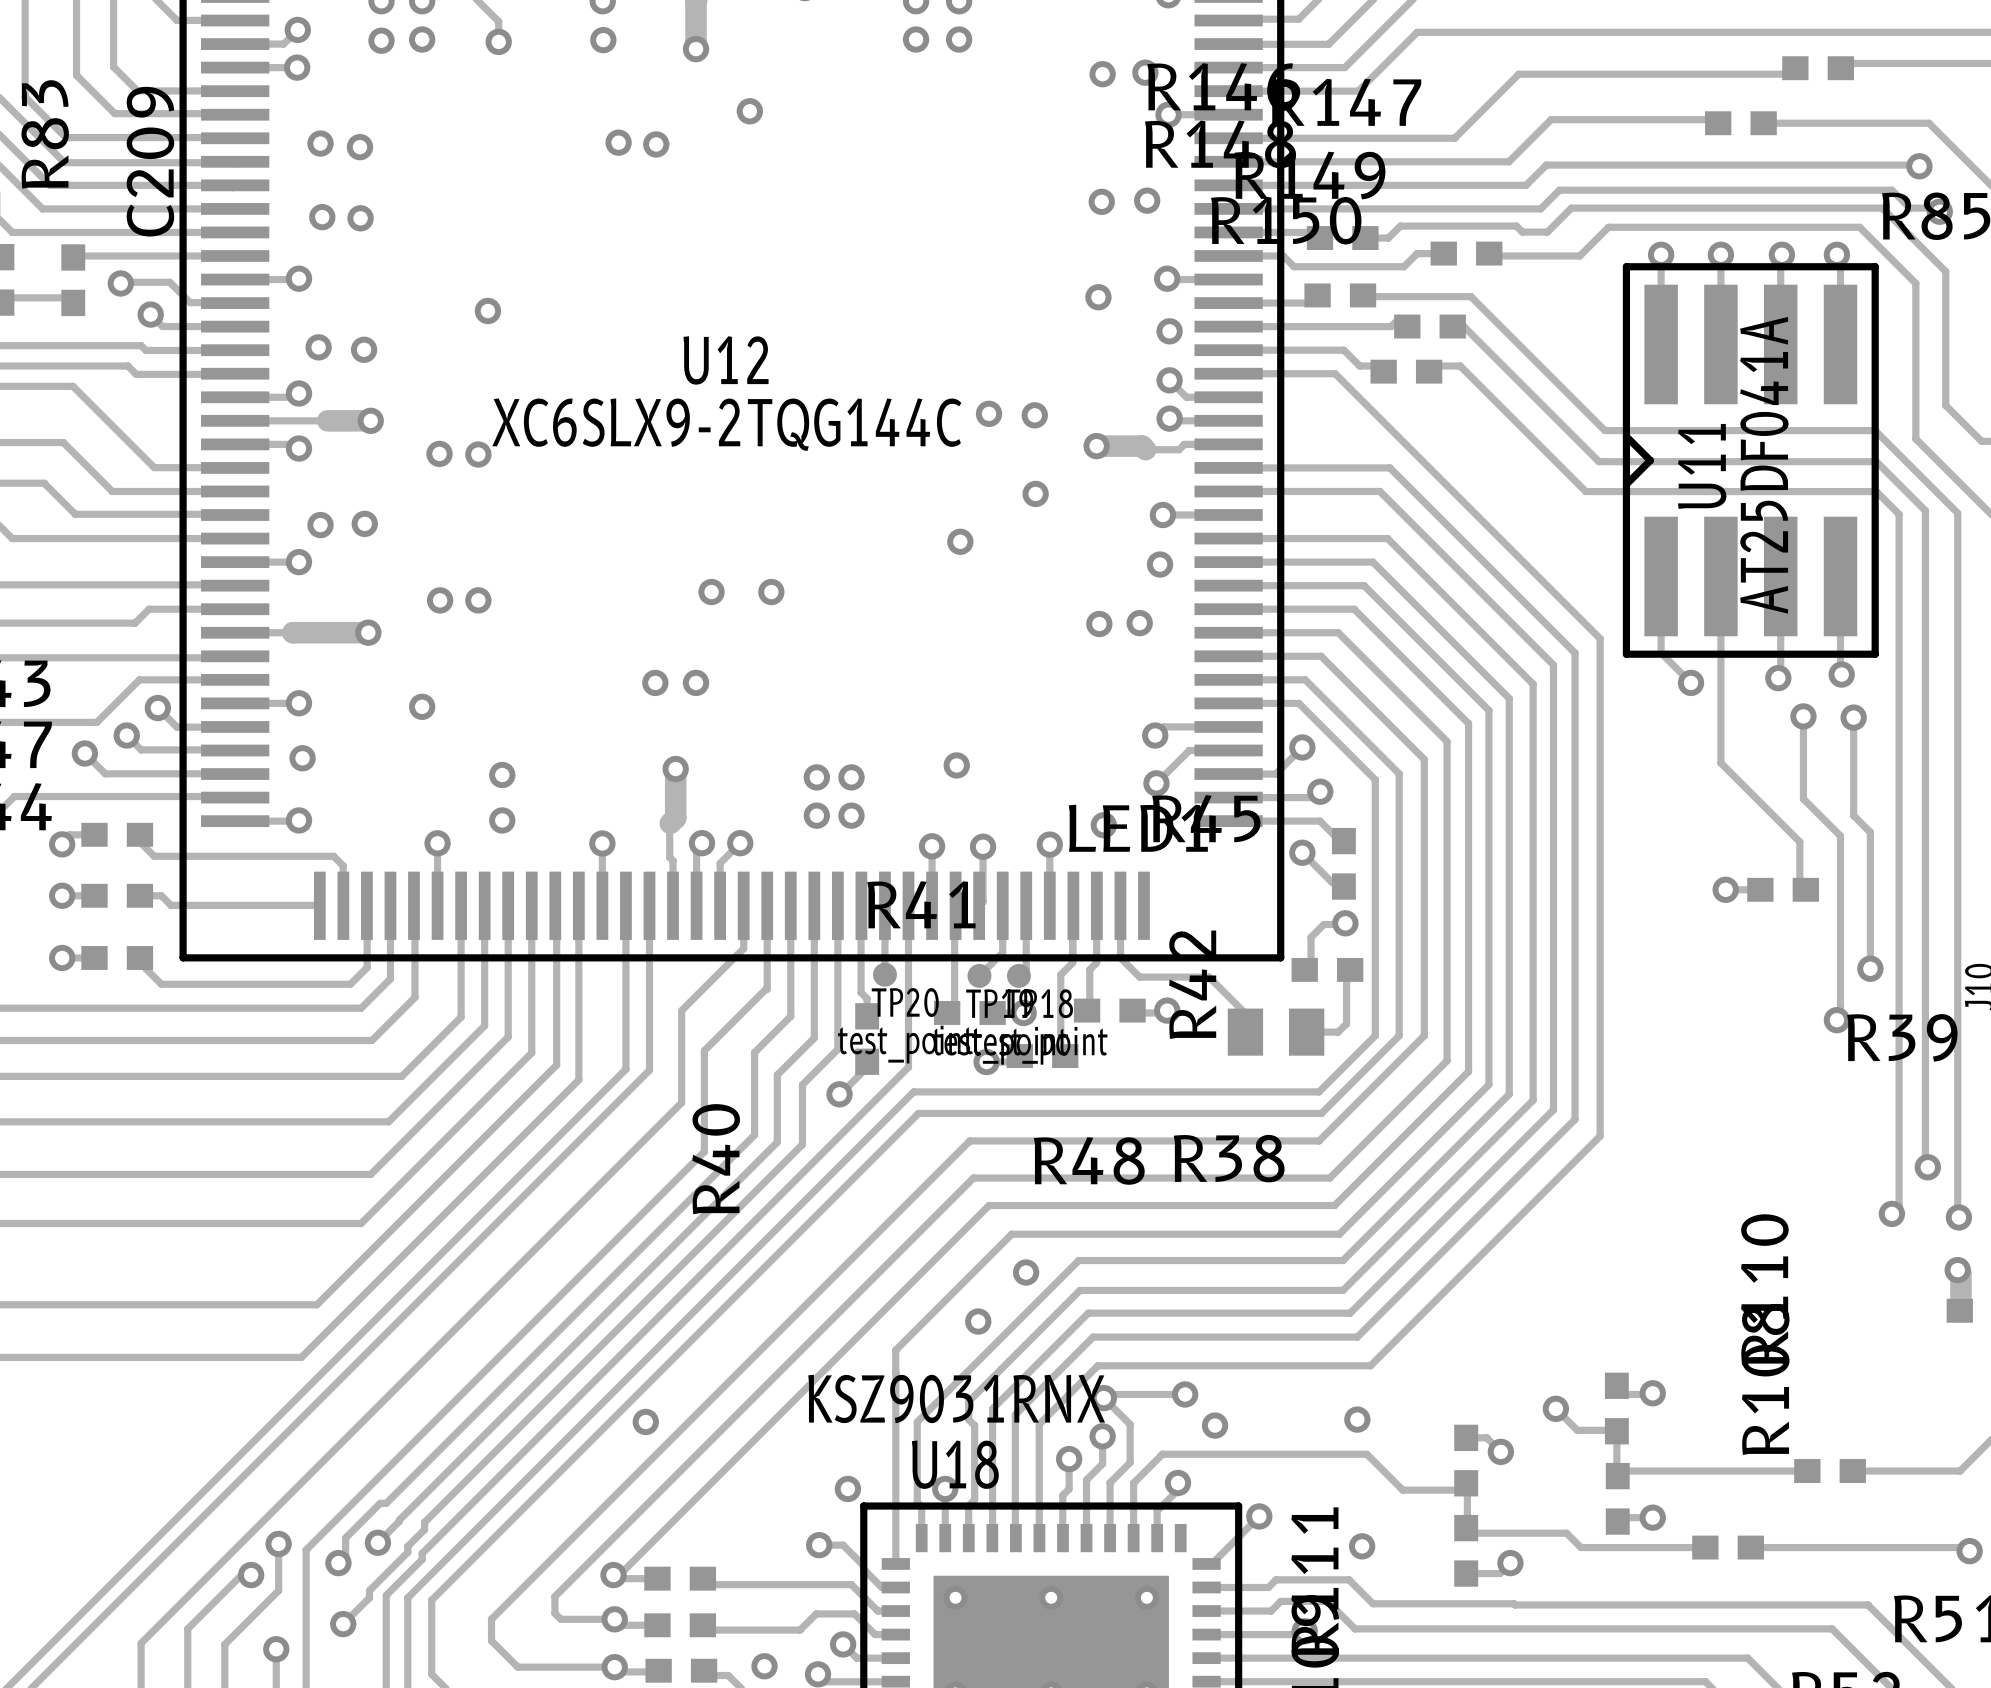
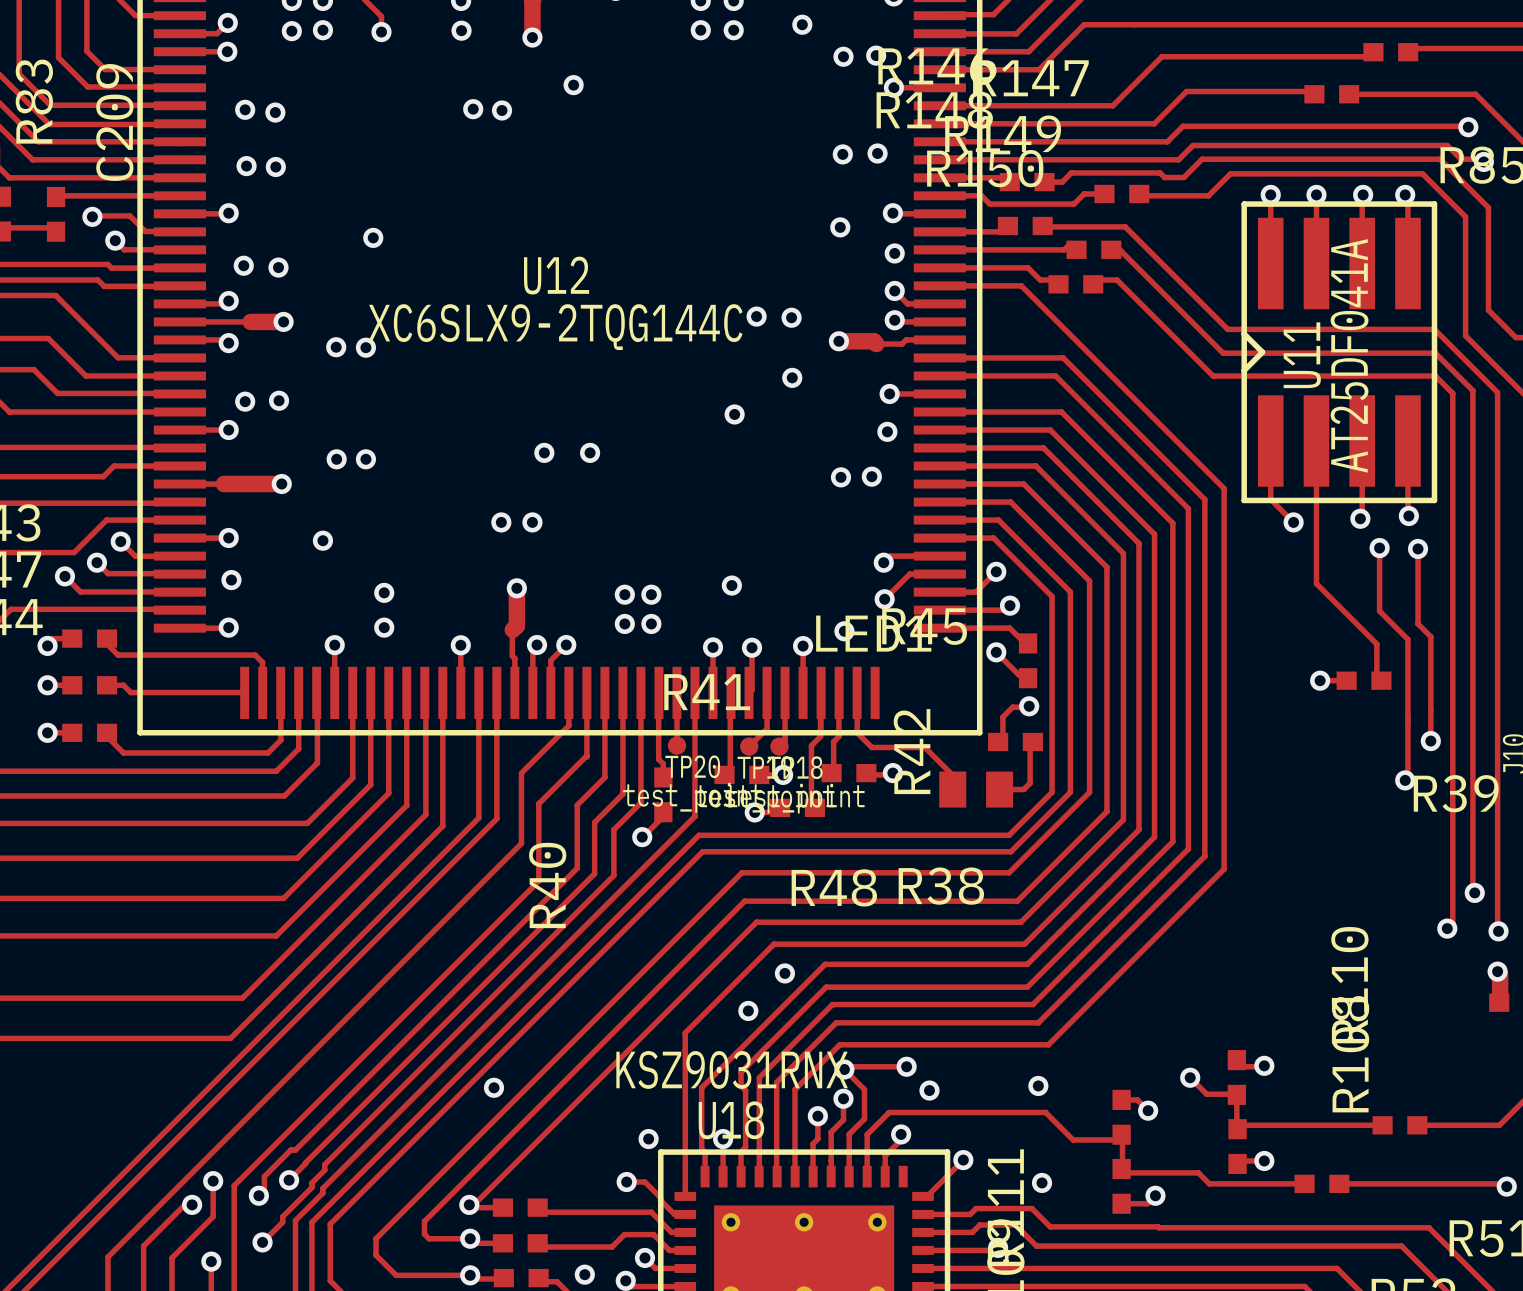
via: none -> (802, 24)

